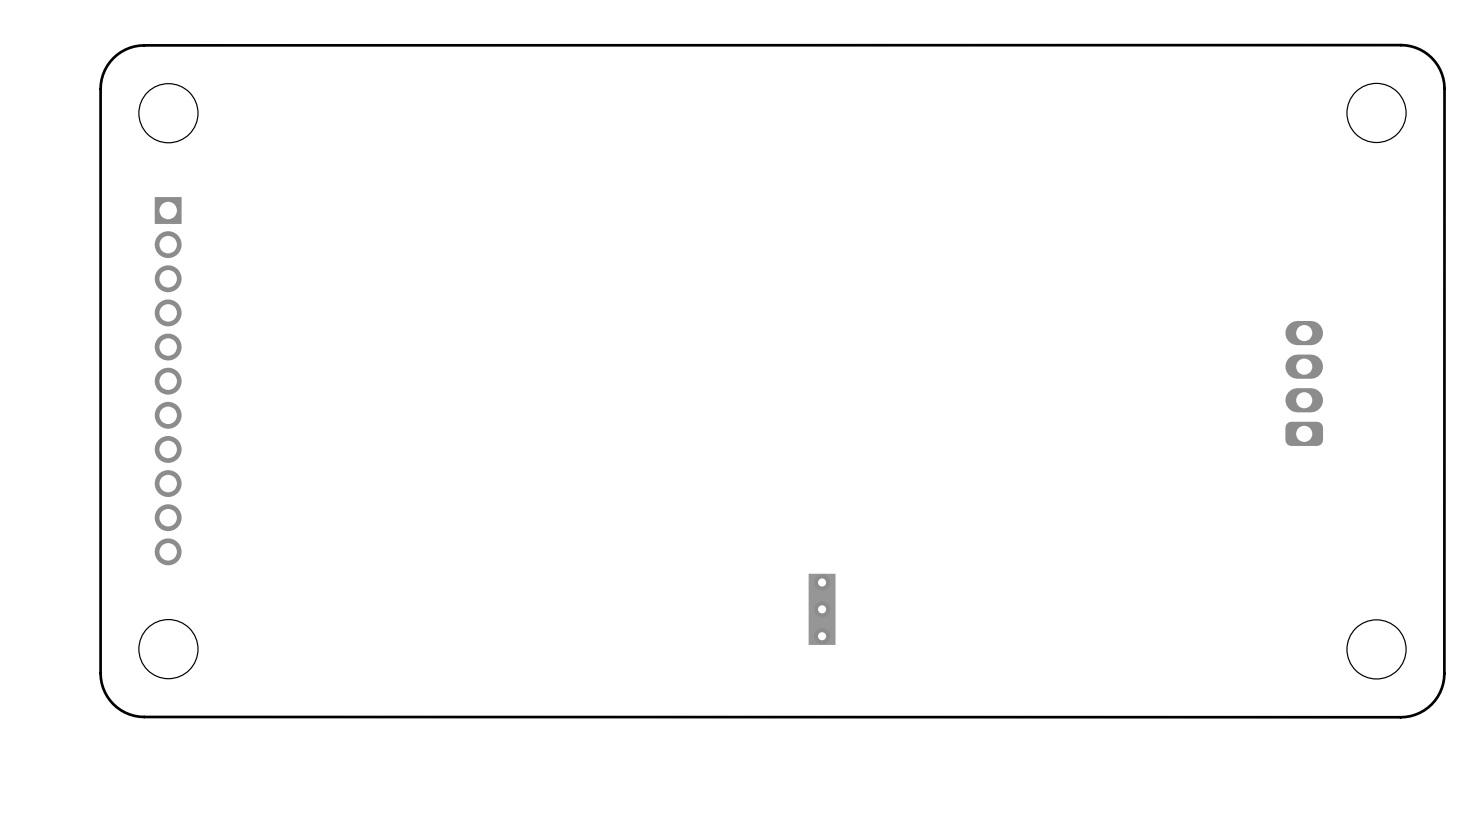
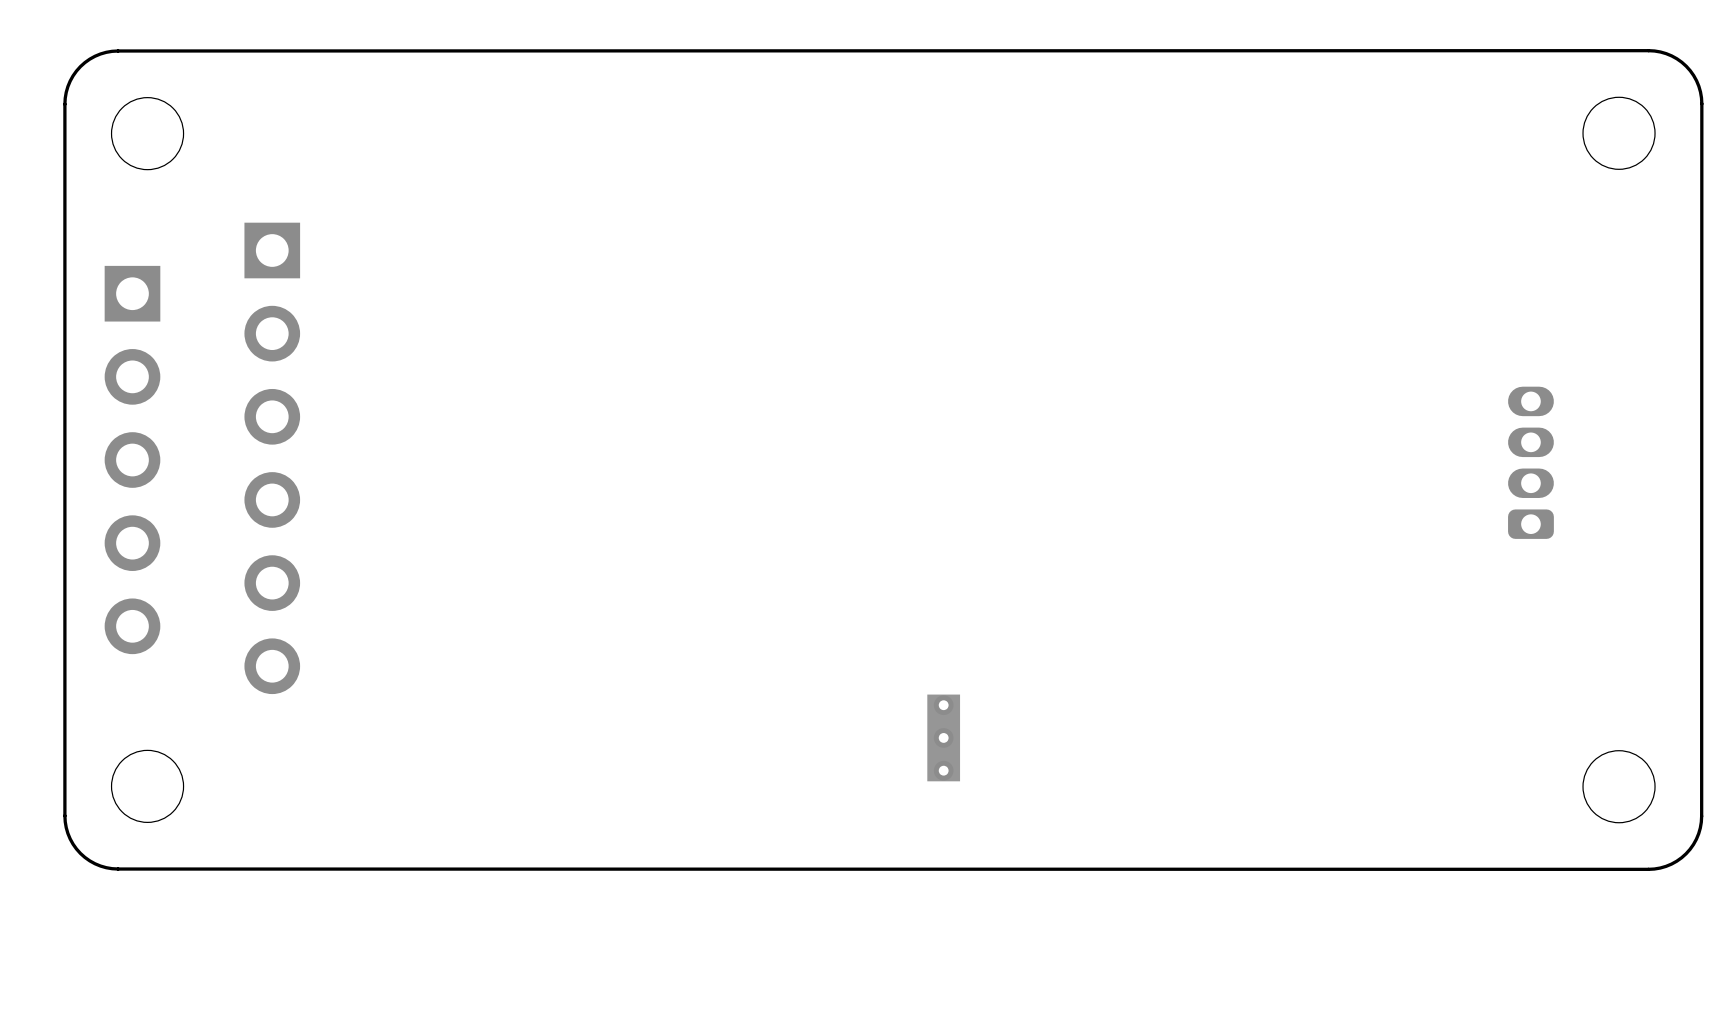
part footprint: [154, 197, 182, 566] -> [104, 265, 161, 655]
part: none -> (272, 458)

